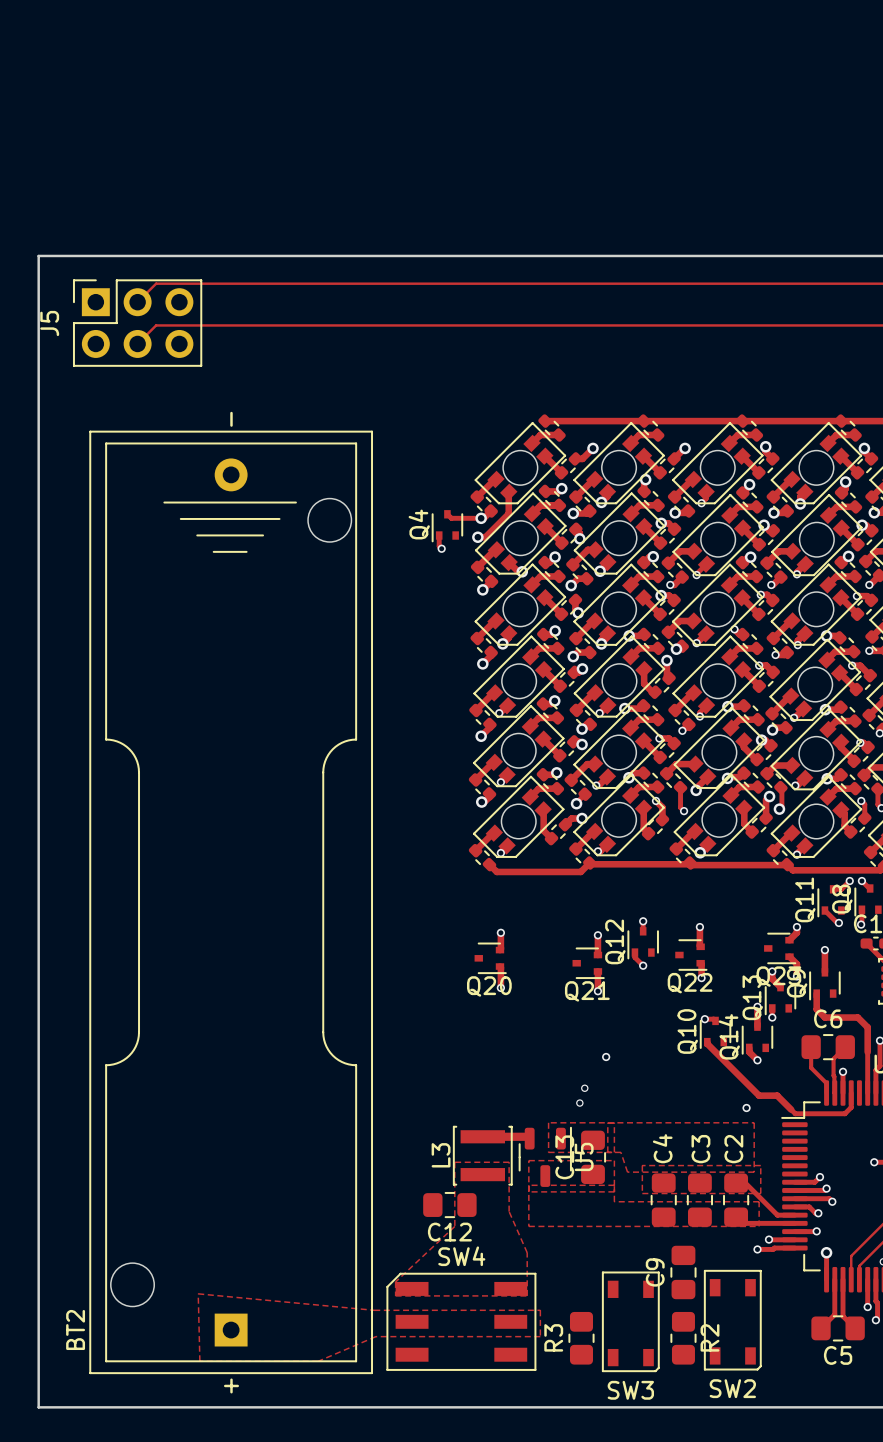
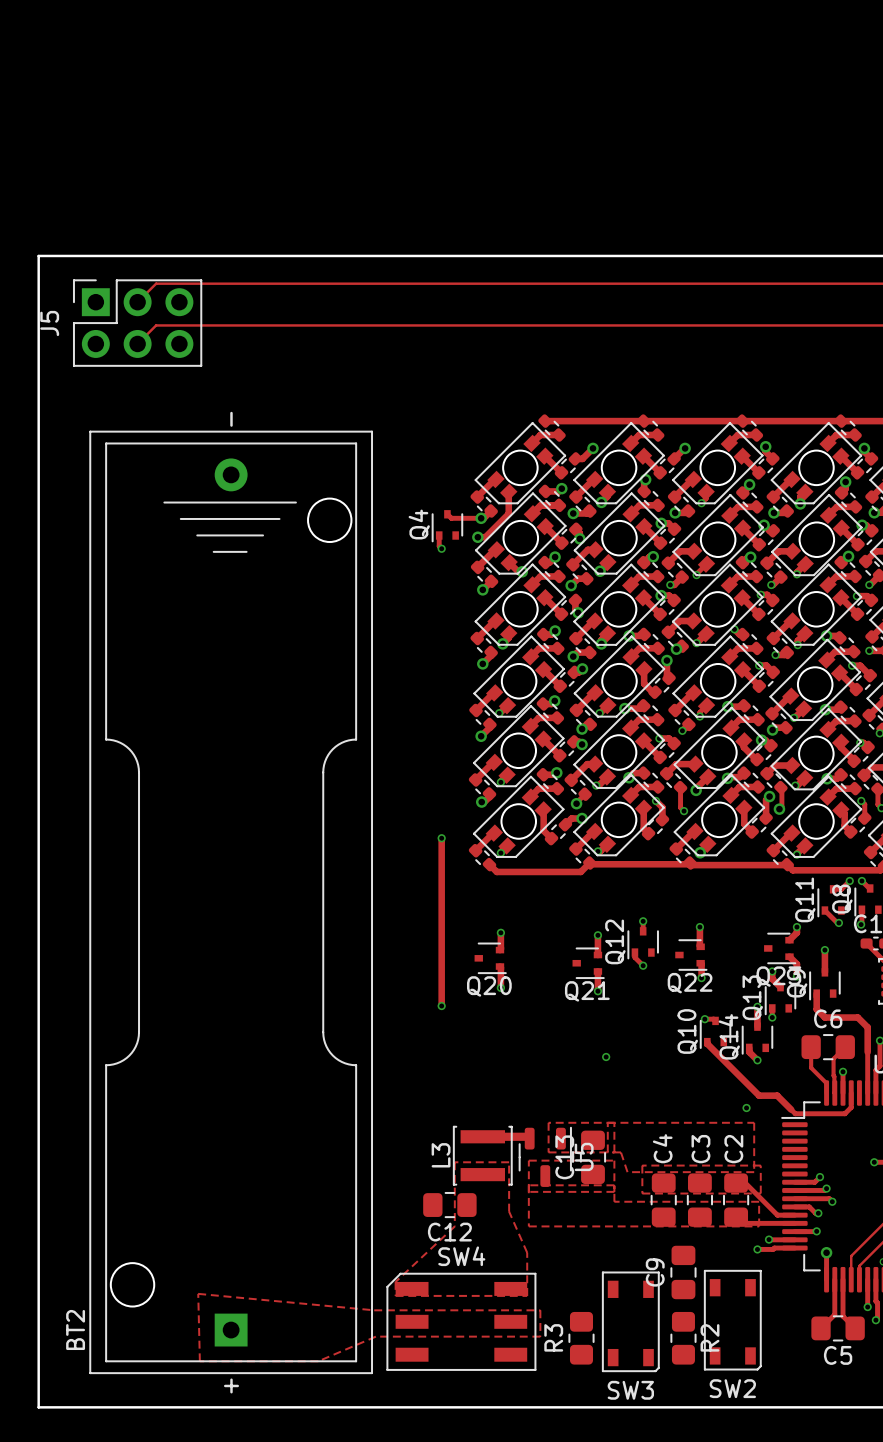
track: none -> (441, 838) (441, 1006)
via: none -> (441, 838)
via: none -> (441, 1006)
via: (584, 1088) -> none
via: (579, 1103) -> none

